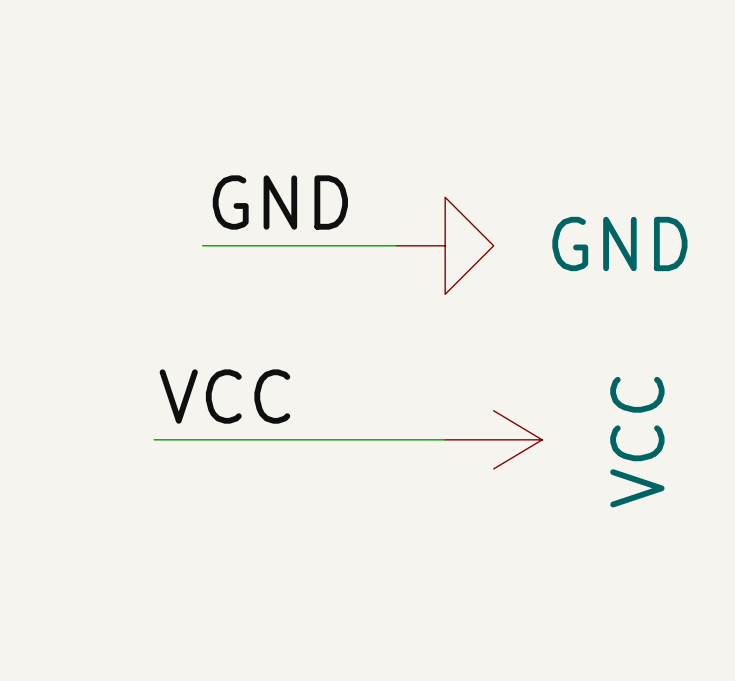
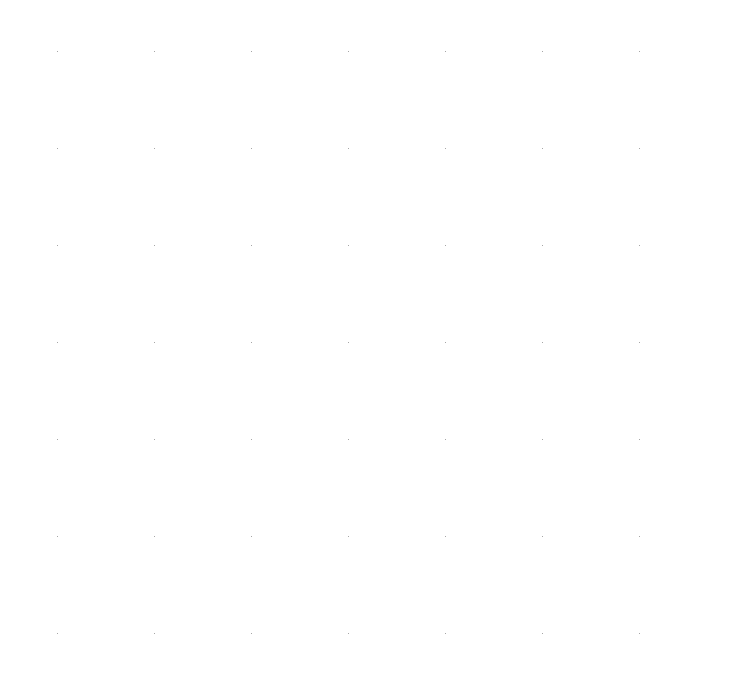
label: GND (280, 202) -> none
wire: (202, 245) (396, 245) -> none
power symbol: GND (445, 245) -> none
label: VCC (224, 396) -> none
wire: (154, 439) (445, 439) -> none
power symbol: VCC (493, 439) -> none

